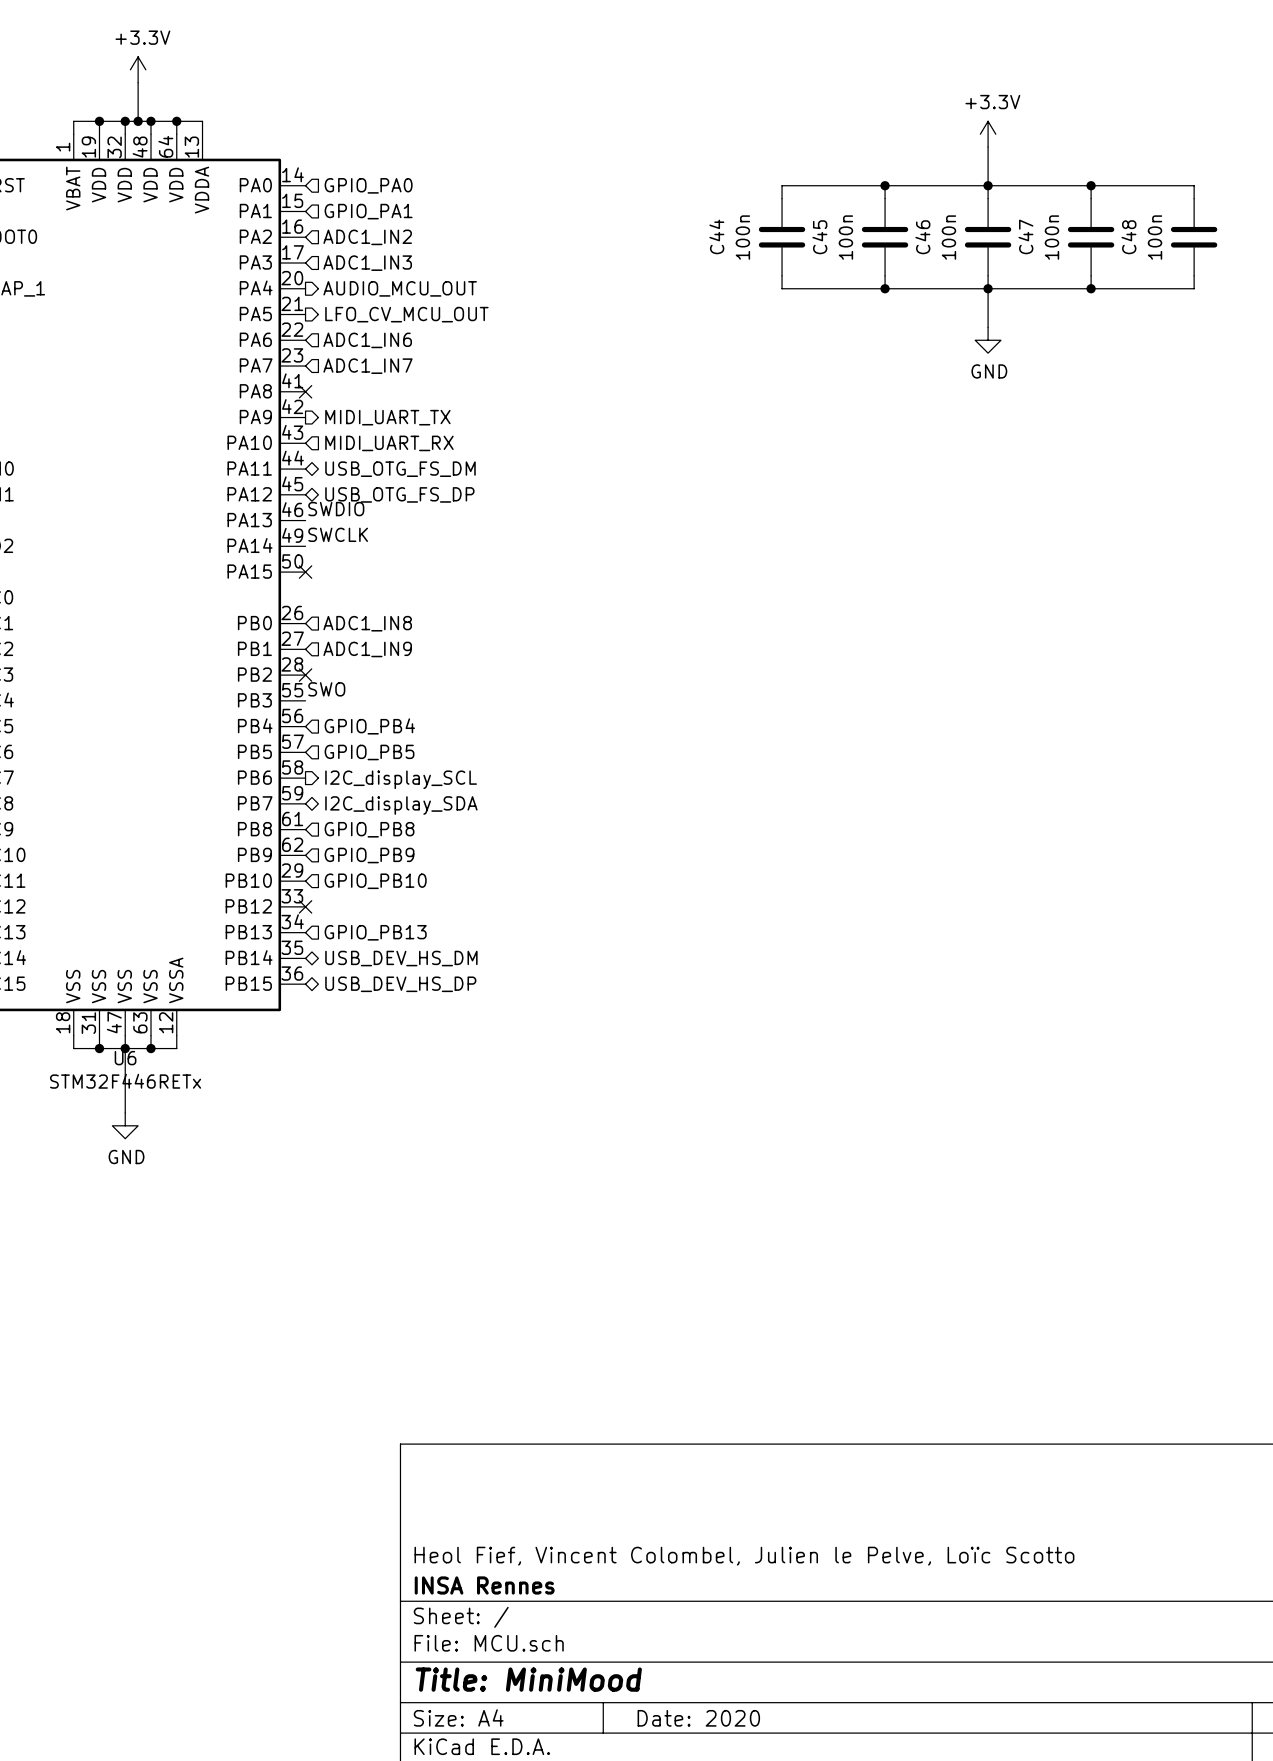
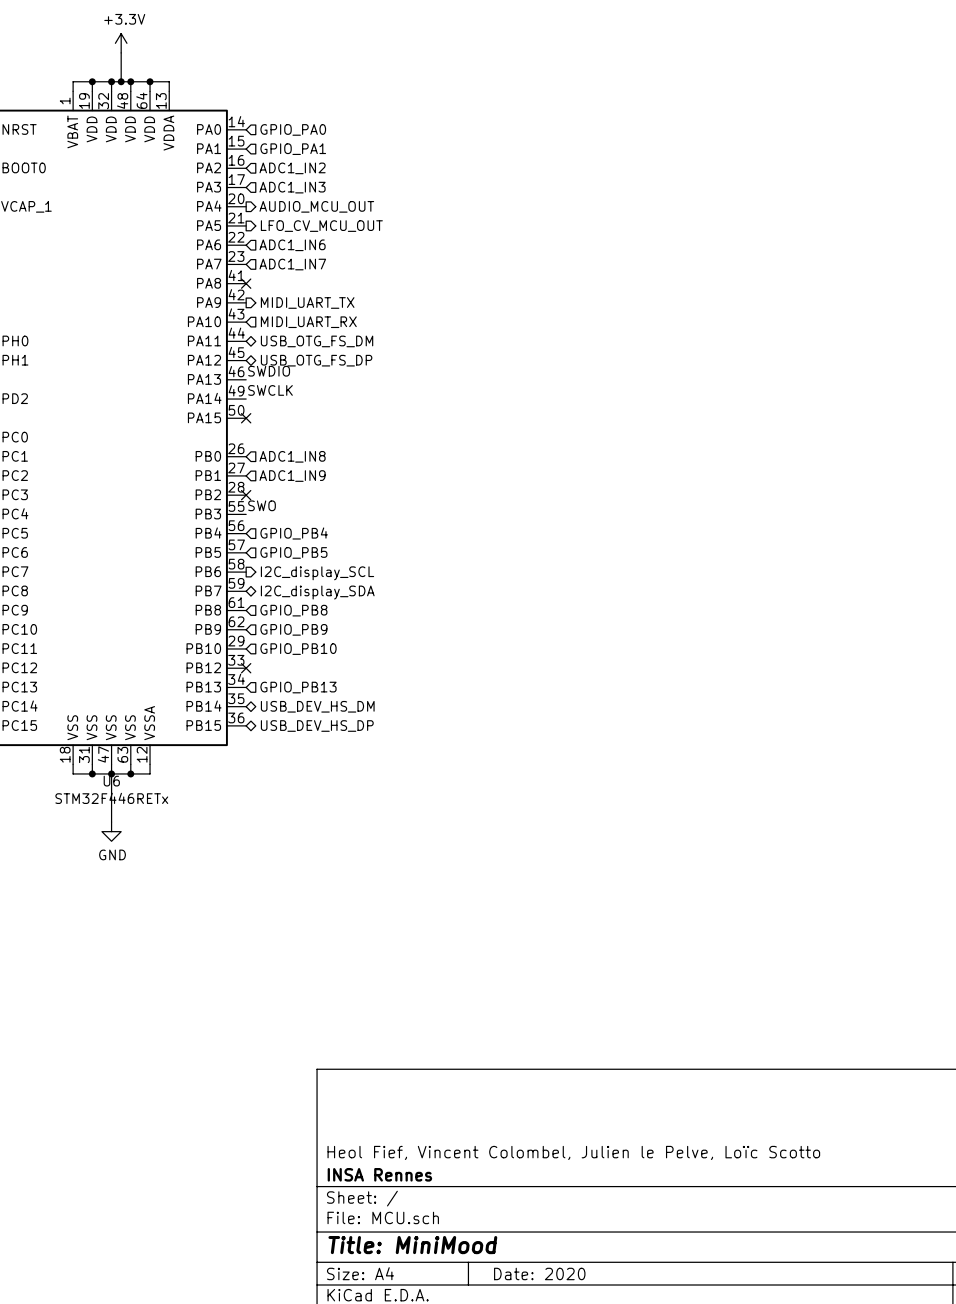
power symbol: +3.3V (988, 134) -> none
wire: (988, 147) (988, 198) -> none
wire: (885, 185) (885, 198) -> none
junction: (885, 185) -> none
junction: (988, 185) -> none
wire: (1091, 185) (1091, 198) -> none
junction: (1091, 185) -> none
wire: (782, 198) (782, 185) (1194, 185) (1194, 198) -> none
C44: 100n (782, 237) -> none
C45: 100n (885, 237) -> none
C46: 100n (988, 237) -> none
C47: 100n (1091, 237) -> none
C48: 100n (1194, 237) -> none
wire: (782, 275) (782, 288) (1194, 288) (1194, 275) -> none
wire: (885, 275) (885, 288) -> none
wire: (988, 275) (988, 327) -> none
wire: (1091, 275) (1091, 288) -> none
junction: (885, 288) -> none
junction: (988, 288) -> none
junction: (1091, 288) -> none
power symbol: GND (988, 340) -> none

